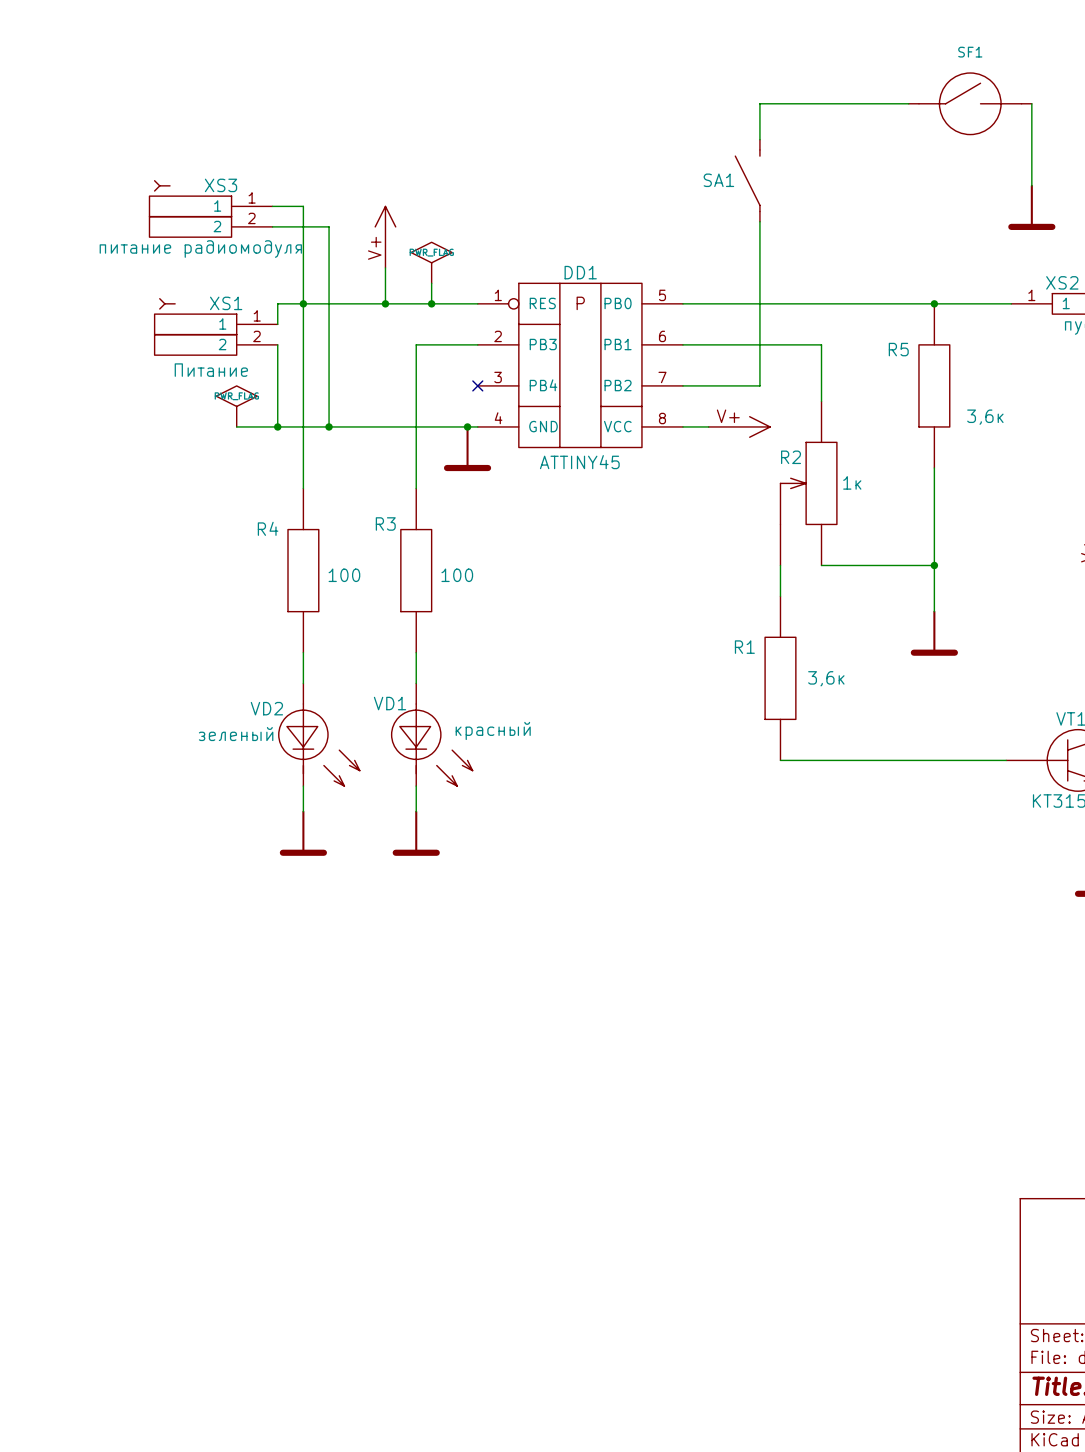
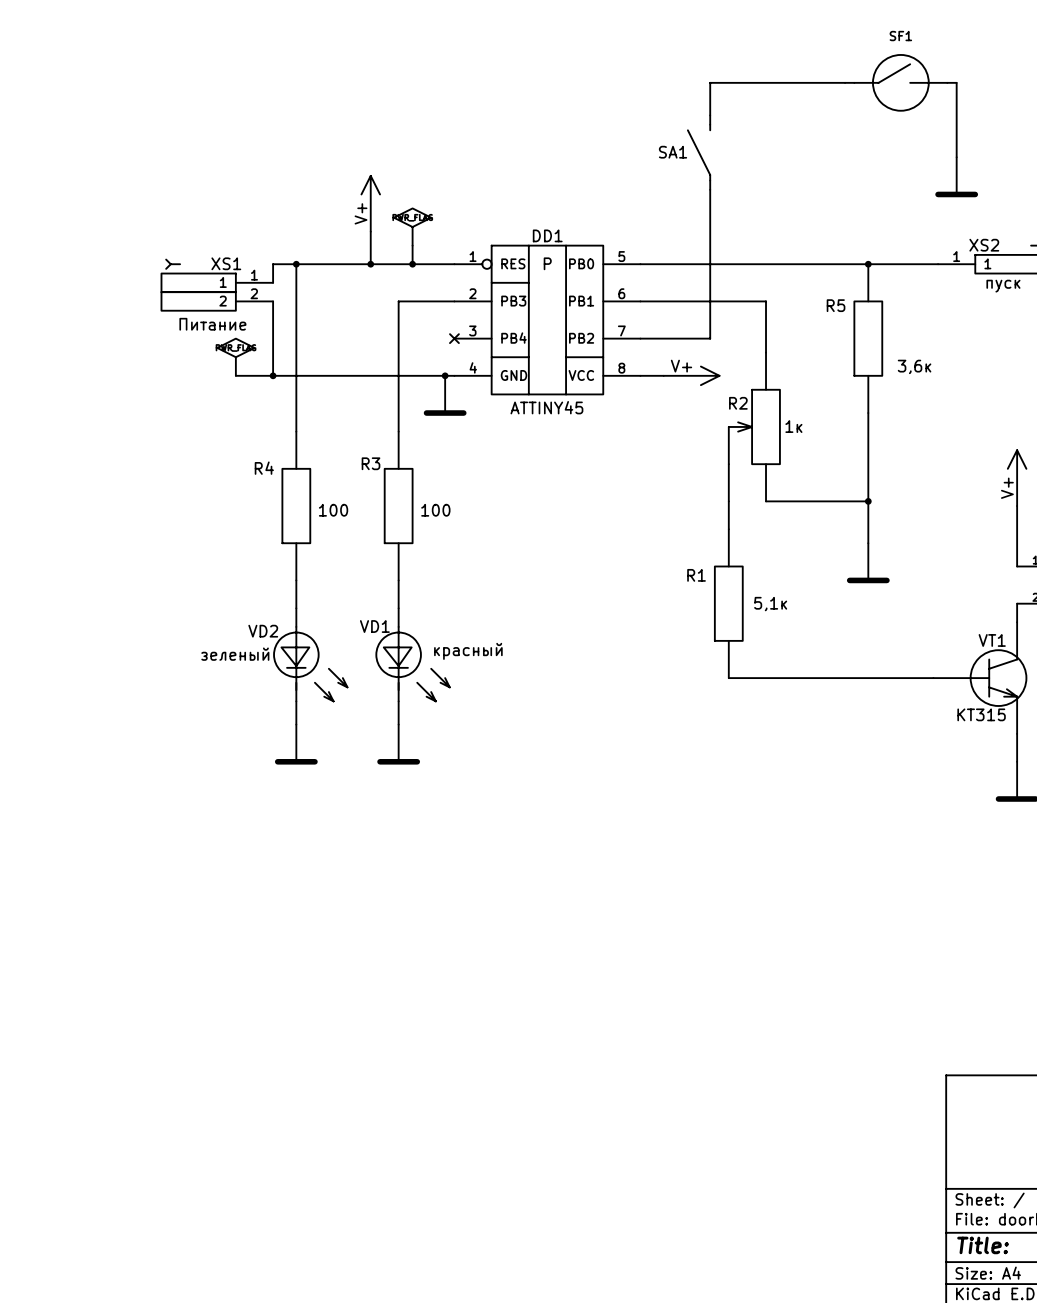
wire: (272, 206) (303, 206) (303, 303) -> none
XS3: питание радиомодуля (211, 208) -> none
wire: (272, 226) (329, 226) (329, 426) -> none
junction: (329, 426) -> none
R1 value: 3,6к (826, 678) -> 5,1к (770, 604)

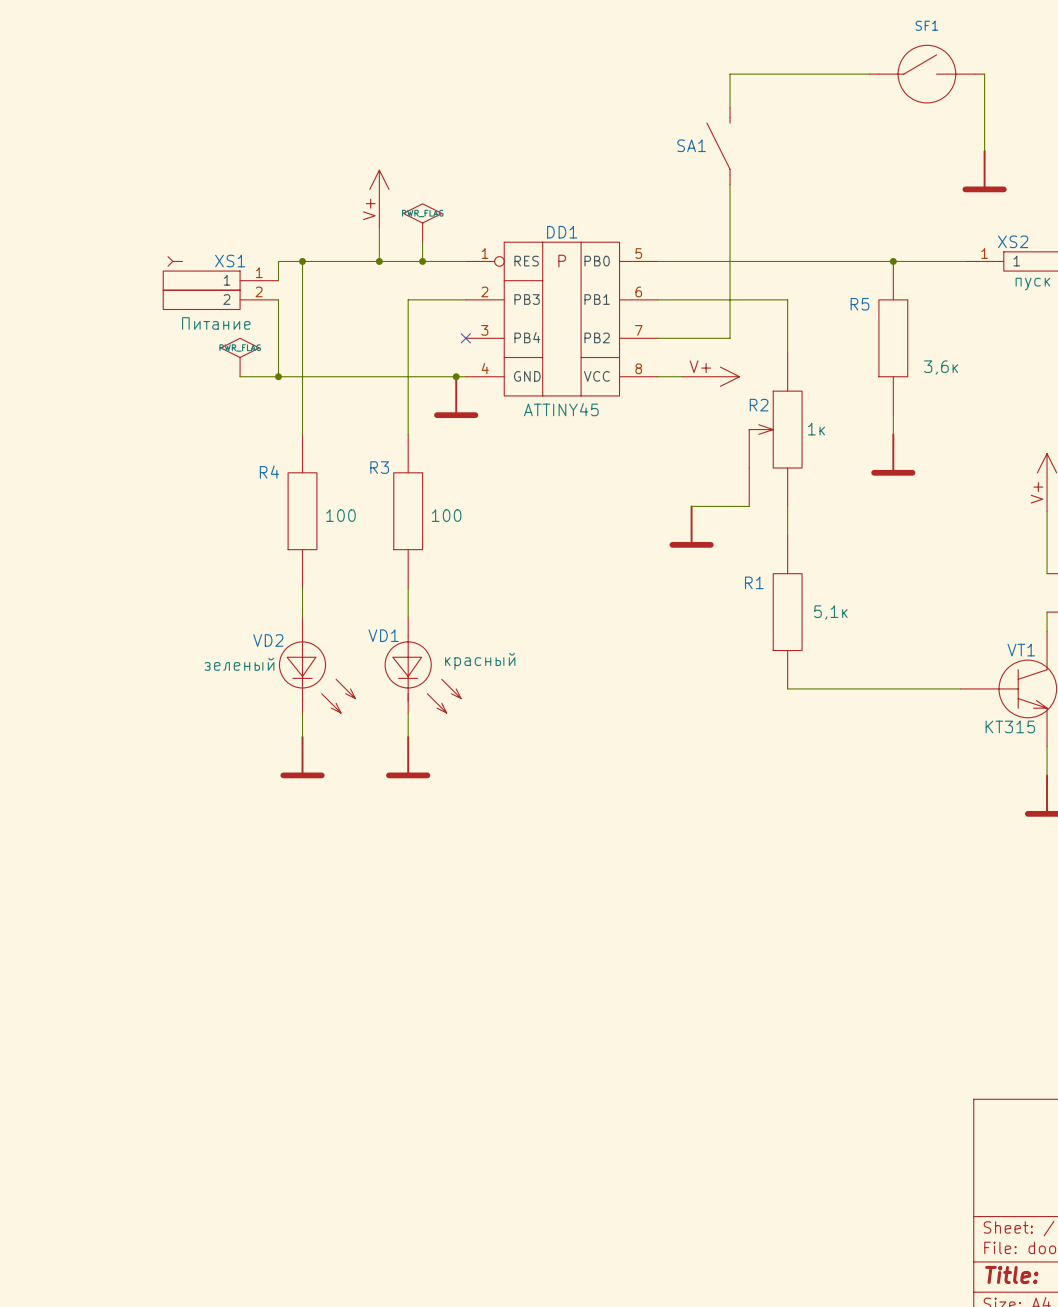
wire: (868, 431) (868, 543) -> none
power symbol: none -> (893, 454)
wire: (728, 501) (728, 529) -> (749, 506) (691, 506)
wire: (766, 501) (868, 501) -> (787, 506) (787, 535)
junction: (868, 501) -> none
power symbol: none -> (691, 526)
power symbol: (868, 562) -> none
R1 position: (728, 603) -> (787, 612)
wire: (728, 678) (766, 678) -> none

